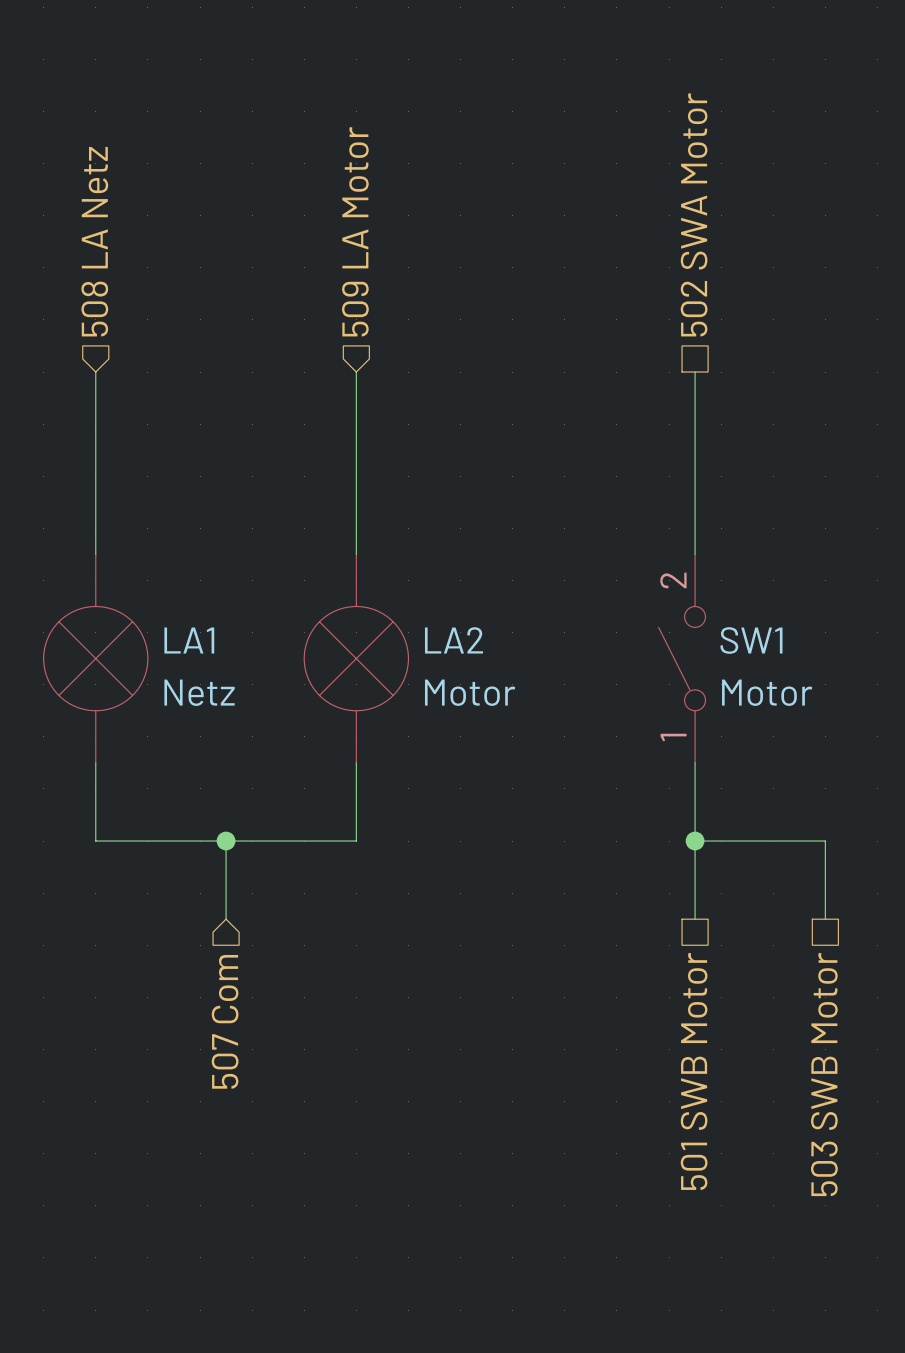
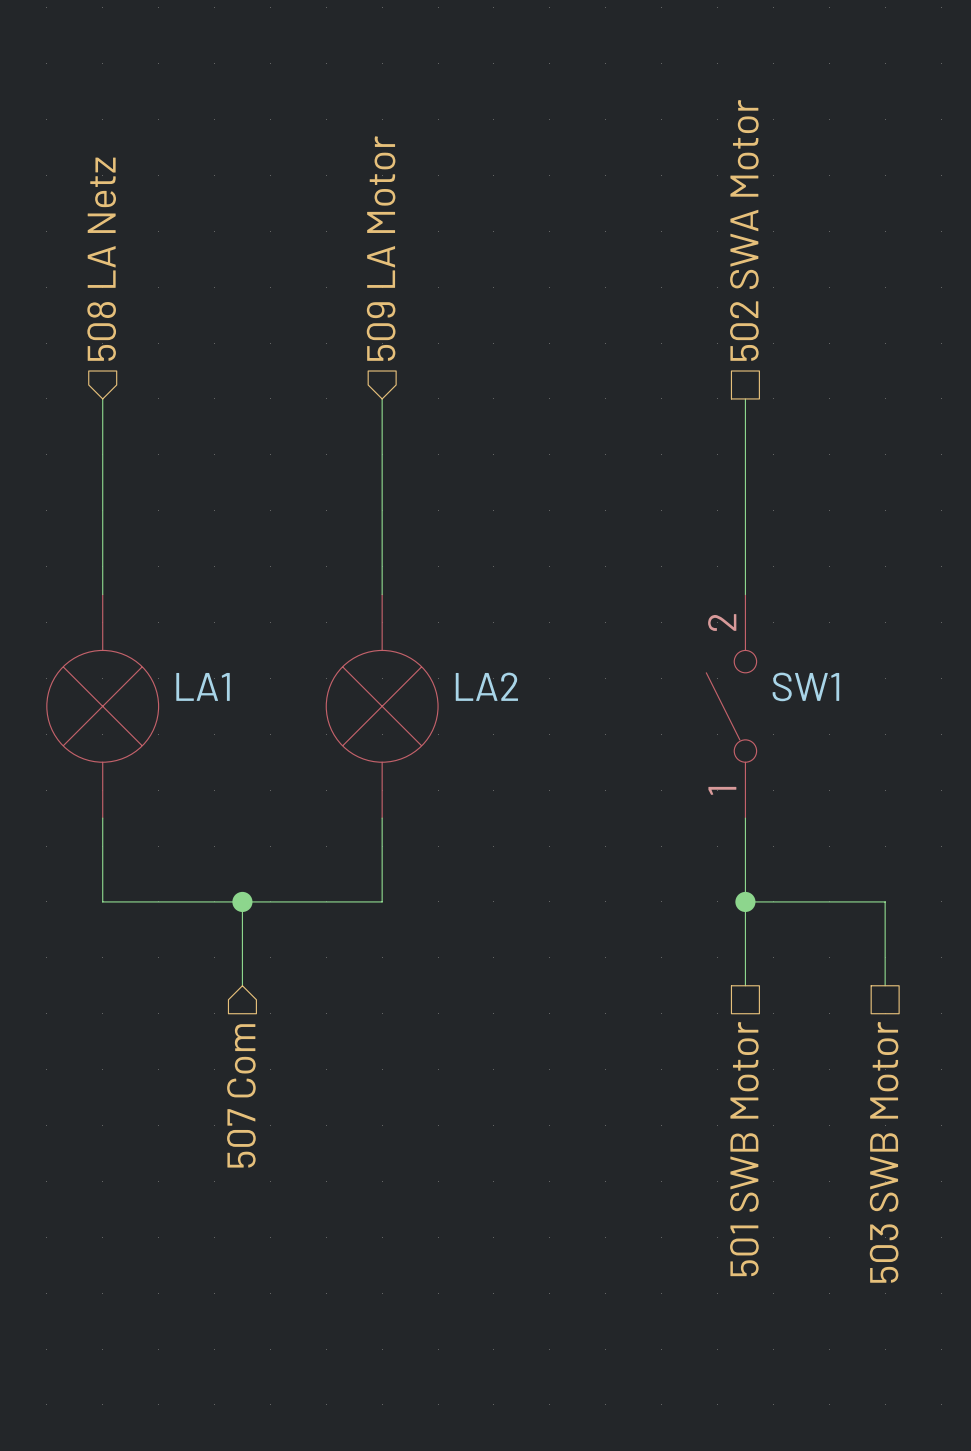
LA1 value: Netz (199, 692) -> none
LA2 value: Motor (470, 692) -> none
SW1 value: Motor (767, 692) -> none

